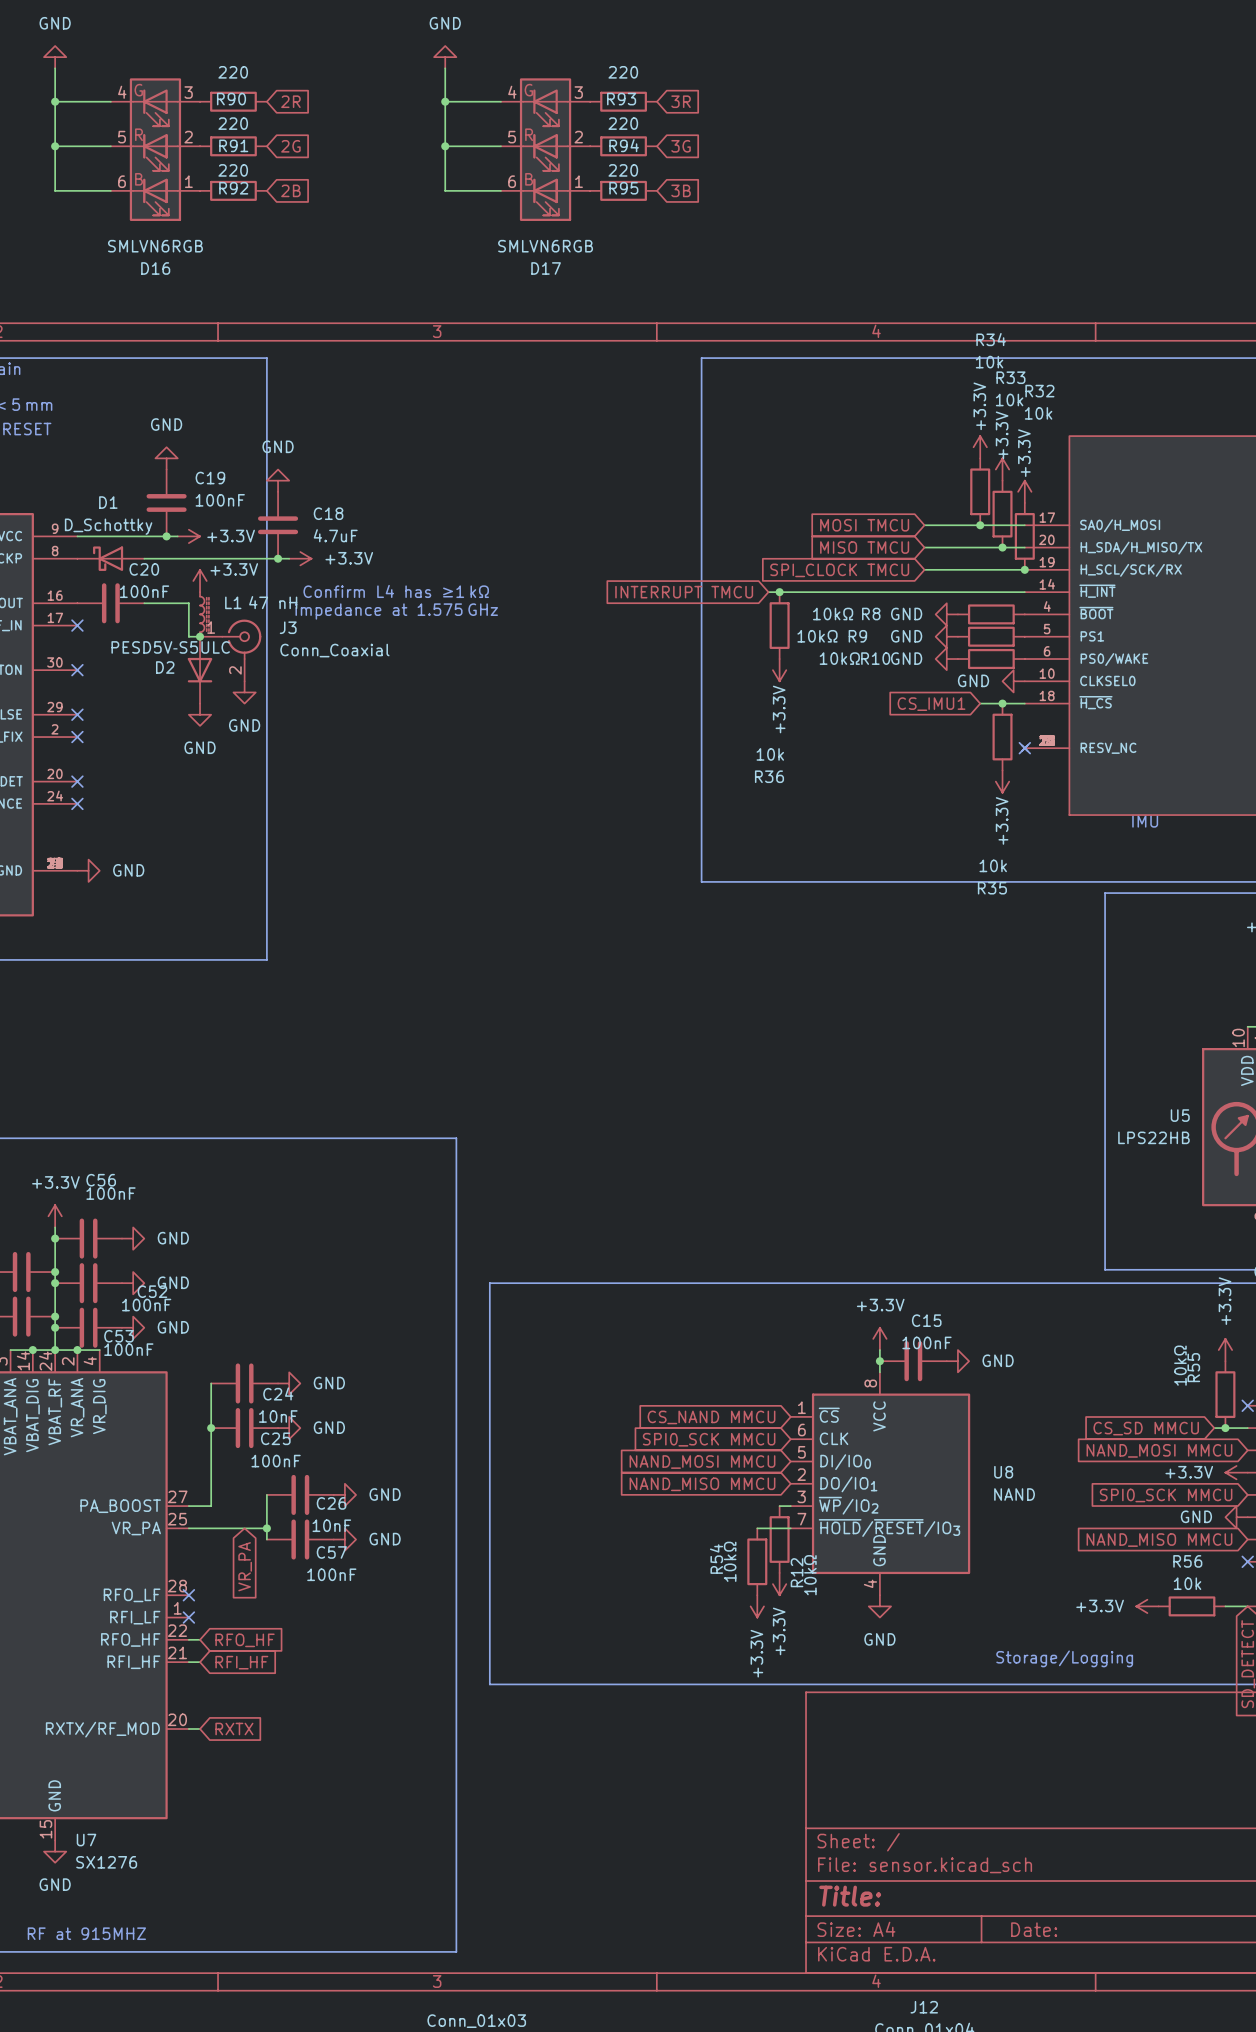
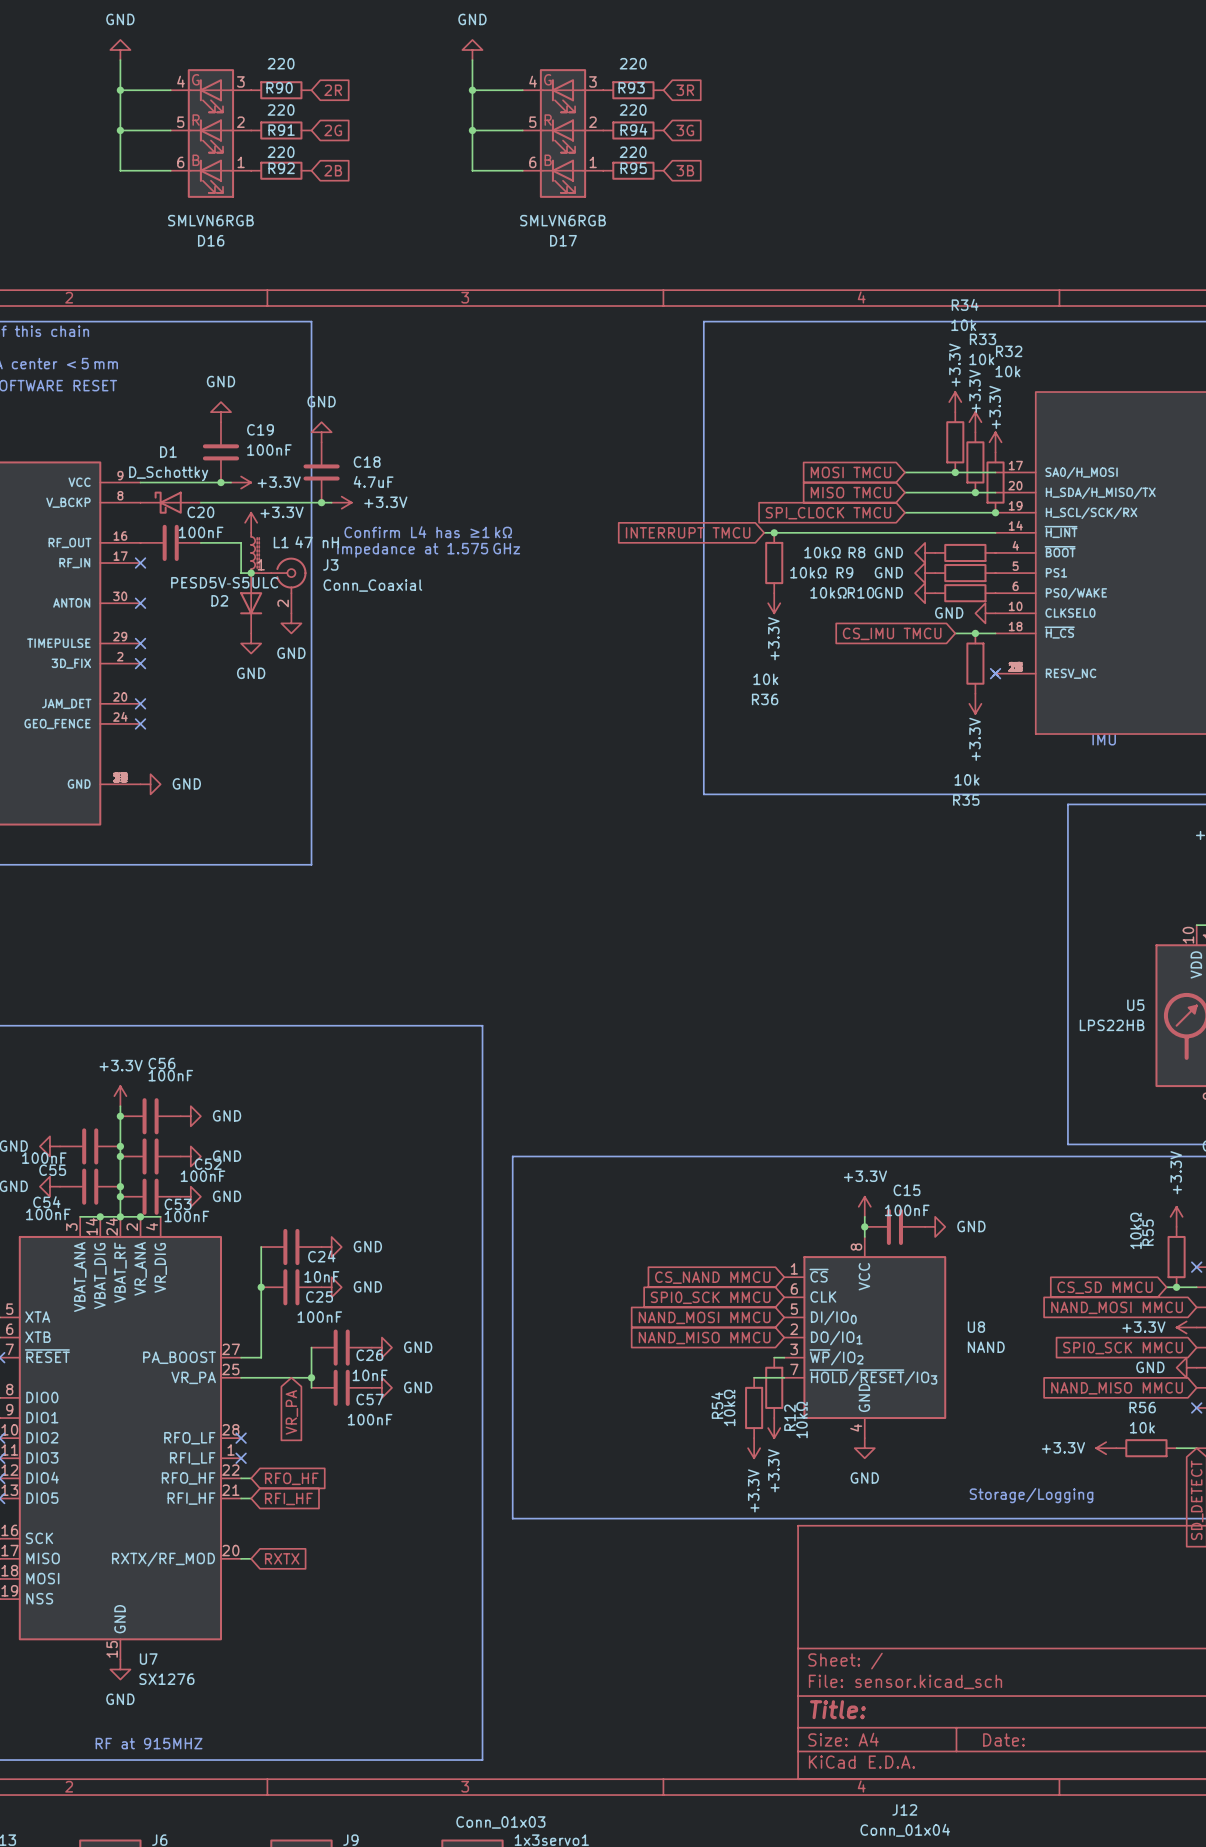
global label: CS_IMU1 (931, 704) -> CS_IMU TMCU (892, 633)

